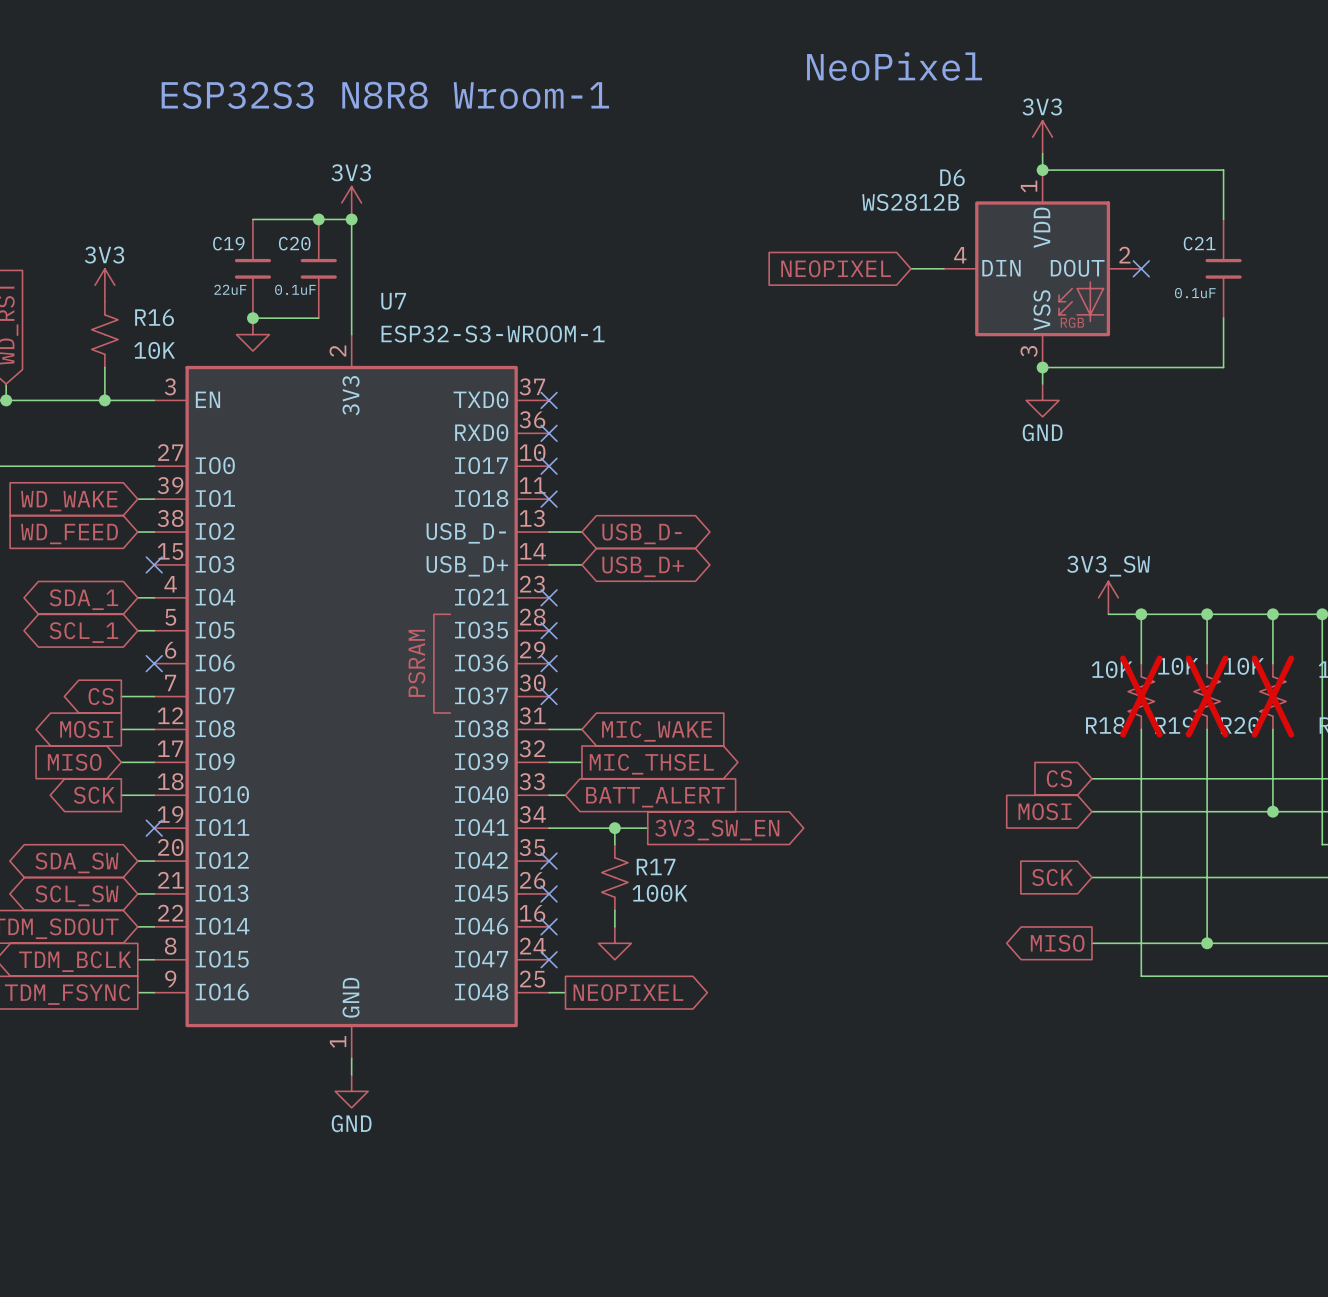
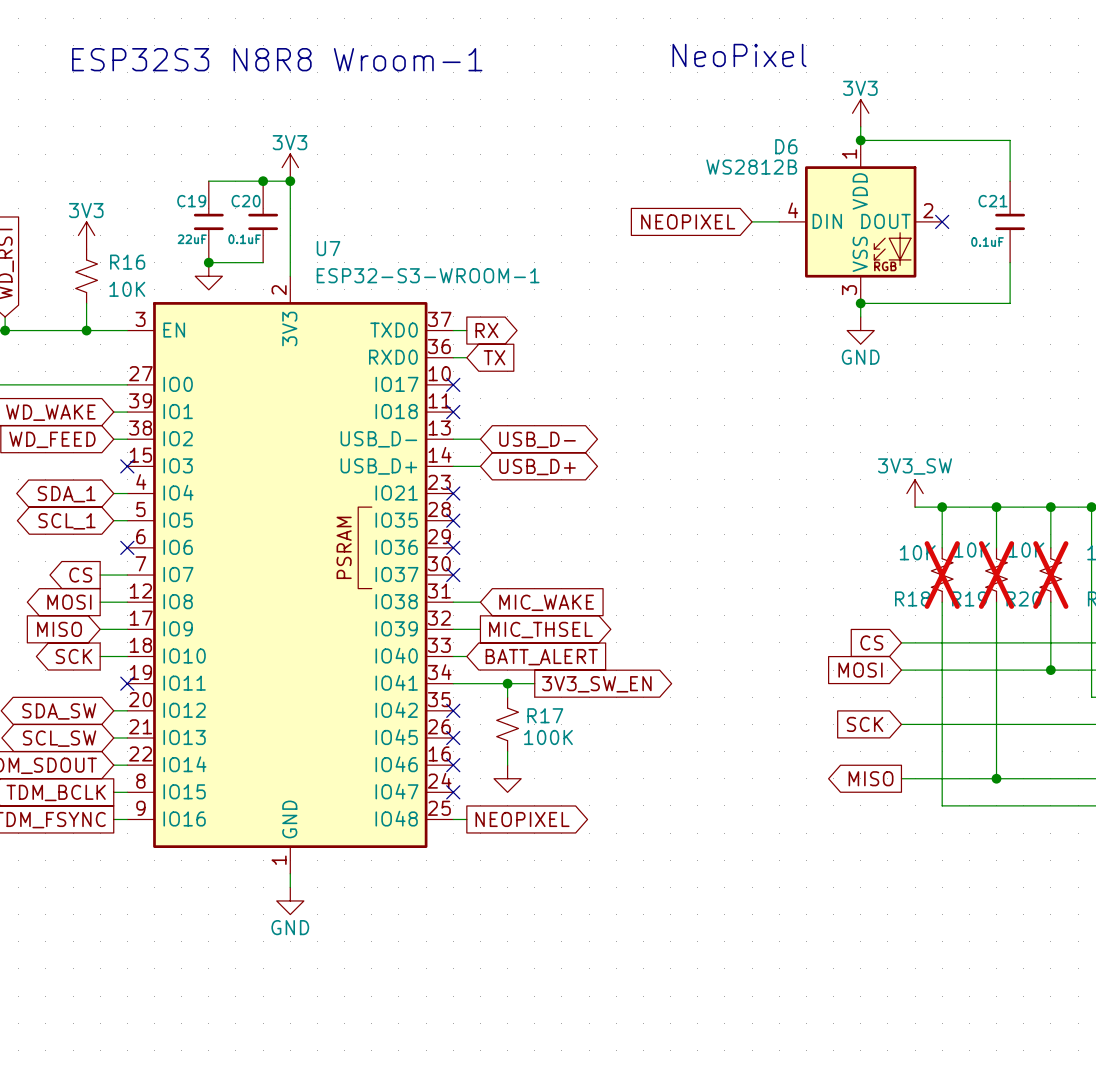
text position: ESP32S3 N8R8 Wroom-1 (385, 95) -> ESP32S3 N8R8 Wroom-1 (277, 59)
wire: none -> (453, 330) (466, 330)
no-connect mark: (549, 400) -> none
global label: none -> RX (486, 330)
wire: none -> (453, 357) (466, 357)
no-connect mark: (549, 433) -> none
global label: none -> TX (494, 357)

